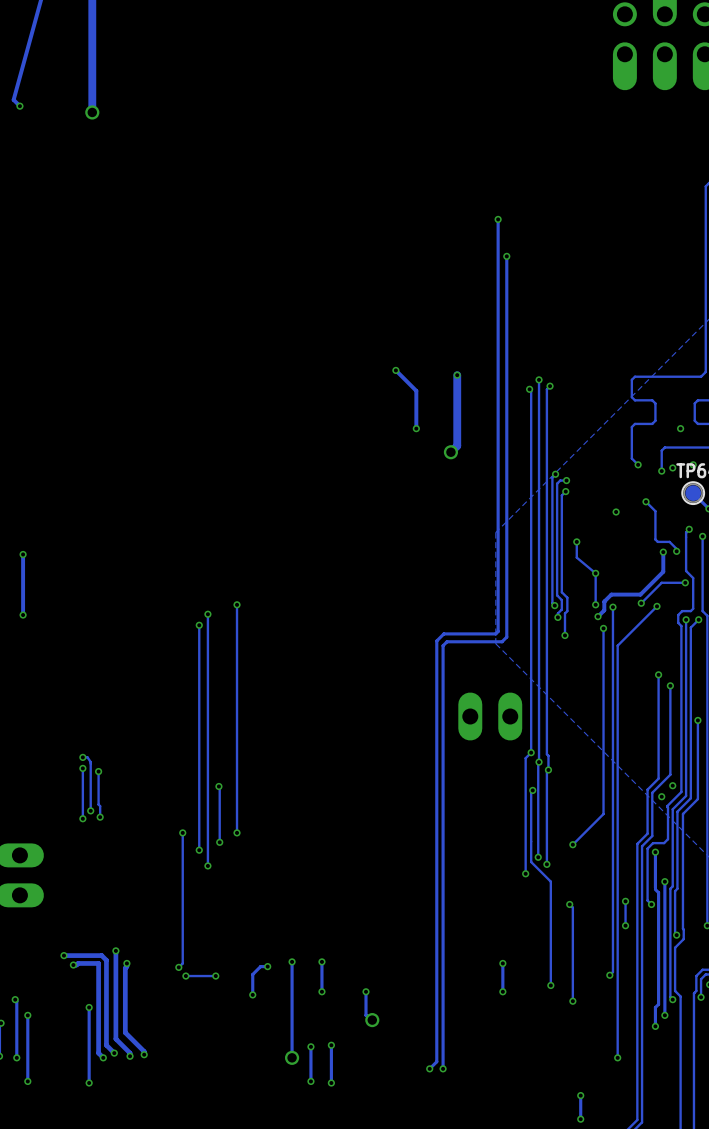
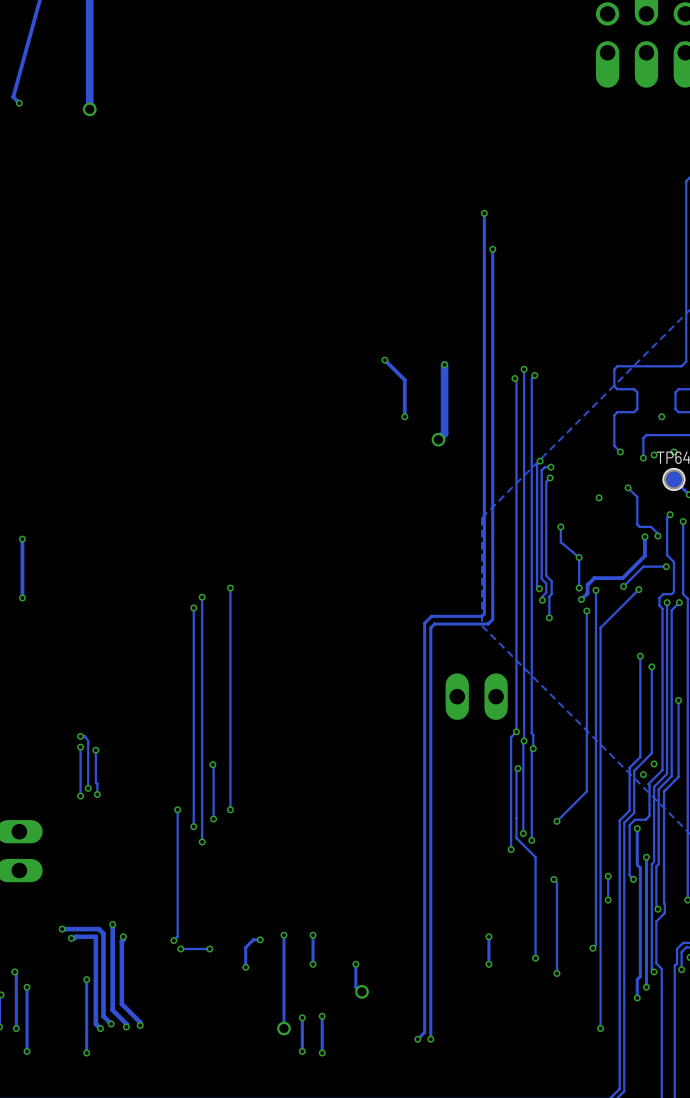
track: (580, 1095) (580, 1119) -> none
via: (580, 1095) -> none
via: (580, 1119) -> none

